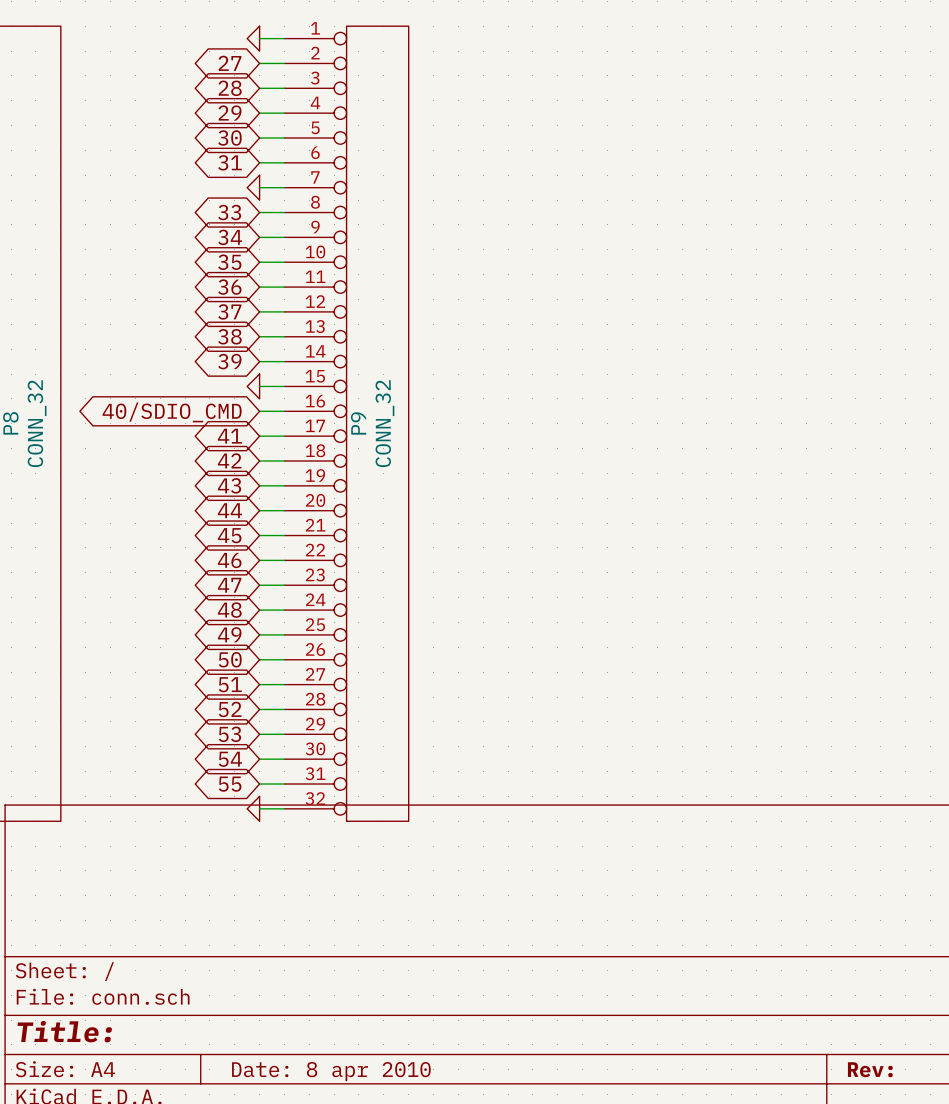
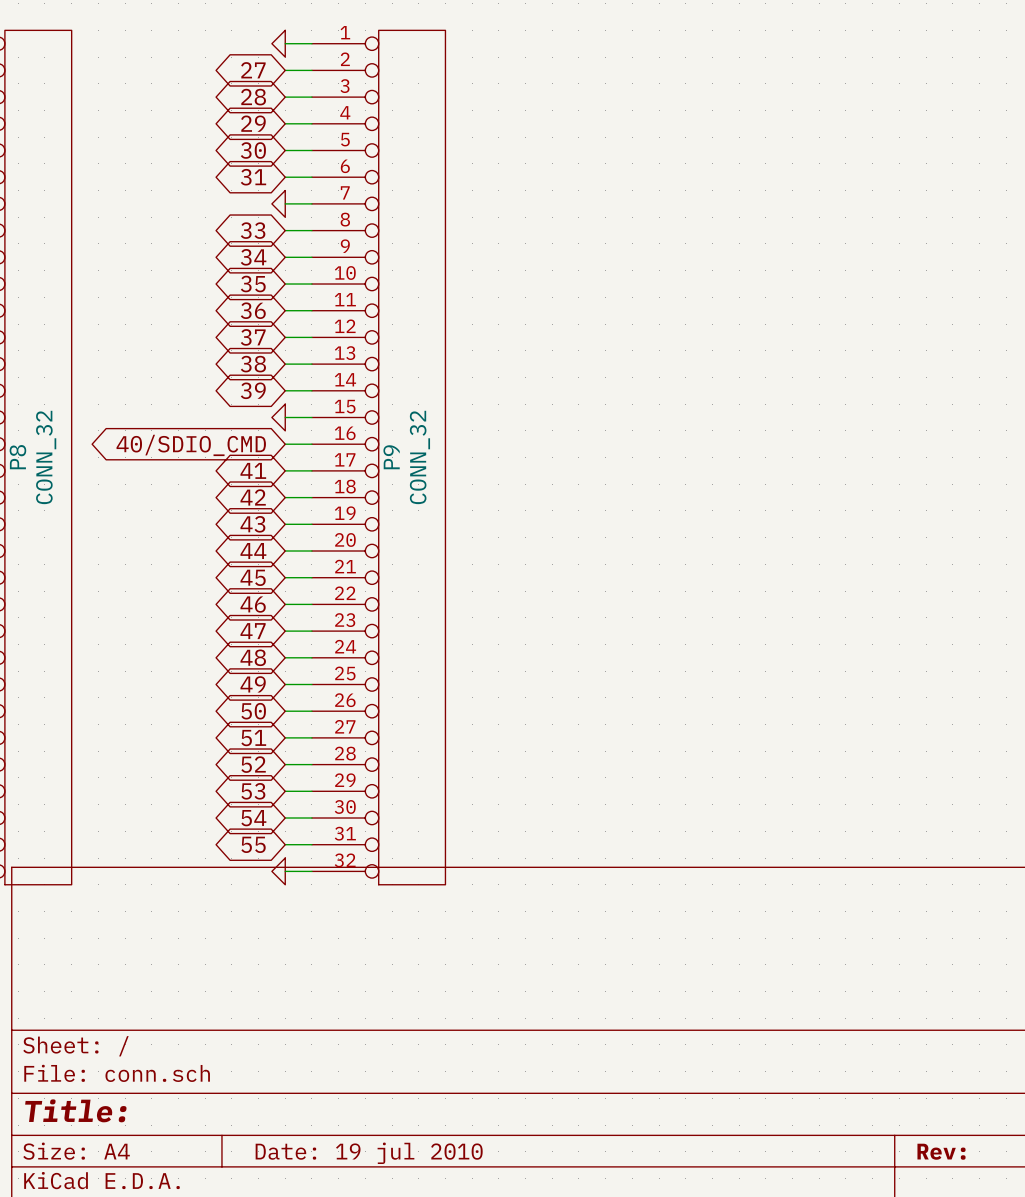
title block: Date: 8 apr 2010 (331, 1071) -> Date: 19 jul 2010 (369, 1153)

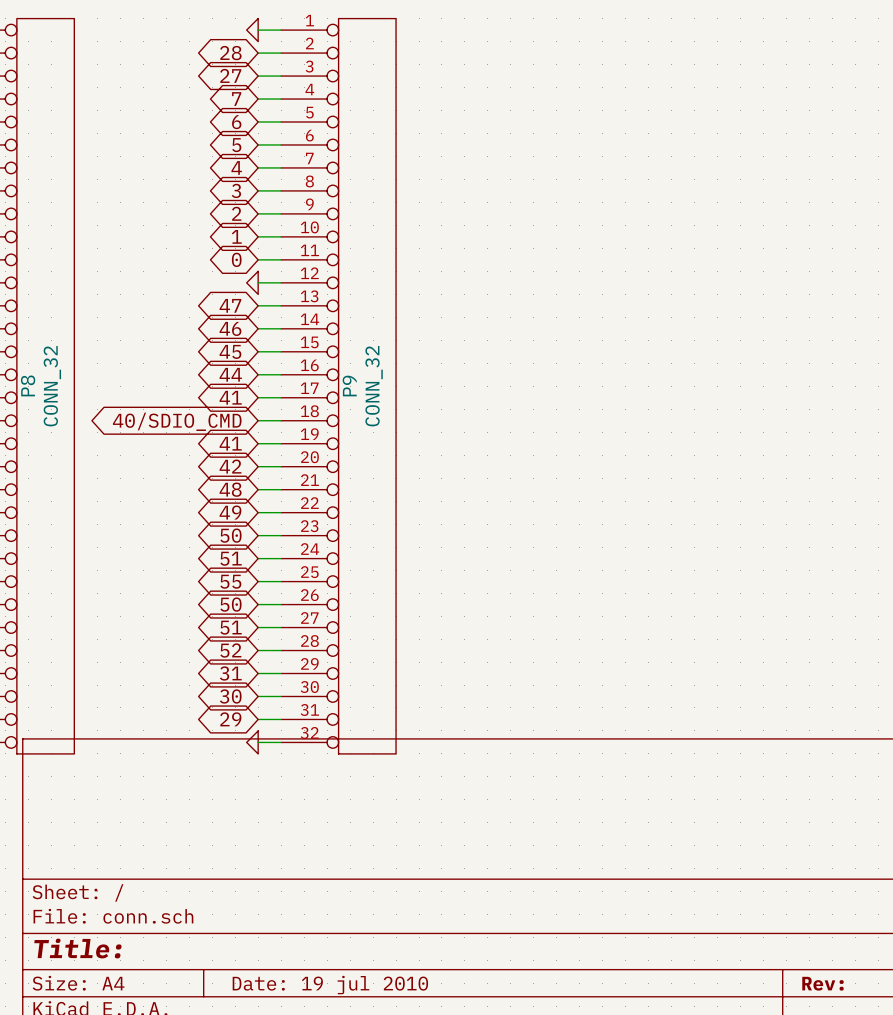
global label: 27 (253, 70) -> 28 (230, 53)
global label: 28 (253, 97) -> 27 (230, 75)
global label: 29 (253, 123) -> 7 (236, 99)
global label: 30 (253, 150) -> 6 (236, 122)
global label: 31 (253, 177) -> 5 (236, 145)
global label: none -> 4 (236, 167)
power symbol: (278, 203) -> none
global label: 33 (253, 230) -> 3 (236, 190)
global label: 34 (253, 257) -> 2 (236, 213)
global label: 35 (253, 284) -> 1 (236, 236)
global label: 36 (253, 310) -> 0 (236, 259)
global label: 37 (253, 337) -> none
power symbol: none -> (252, 282)
global label: 38 (253, 364) -> 47 (230, 305)
global label: 39 (253, 390) -> 46 (230, 328)
global label: none -> 45 (230, 351)
power symbol: (278, 417) -> none
global label: 40/SDIO_CMD (191, 445) -> 44 (230, 374)
global label: 42 (253, 497) -> 40/SDIO_CMD (177, 421)
global label: 43 (252, 524) -> 41 (230, 443)
global label: 44 (253, 551) -> 42 (230, 466)
global label: 45 (253, 577) -> 48 (230, 489)
global label: 46 (253, 604) -> 49 (230, 512)
global label: 47 (253, 631) -> 50 (230, 535)
global label: 48 (253, 657) -> 51 (231, 558)
global label: 49 (253, 684) -> 55 (230, 581)
global label: 53 (253, 791) -> 31 (230, 673)
global label: 54 (253, 818) -> 30 (230, 696)
global label: 55 (253, 844) -> 29 (230, 719)

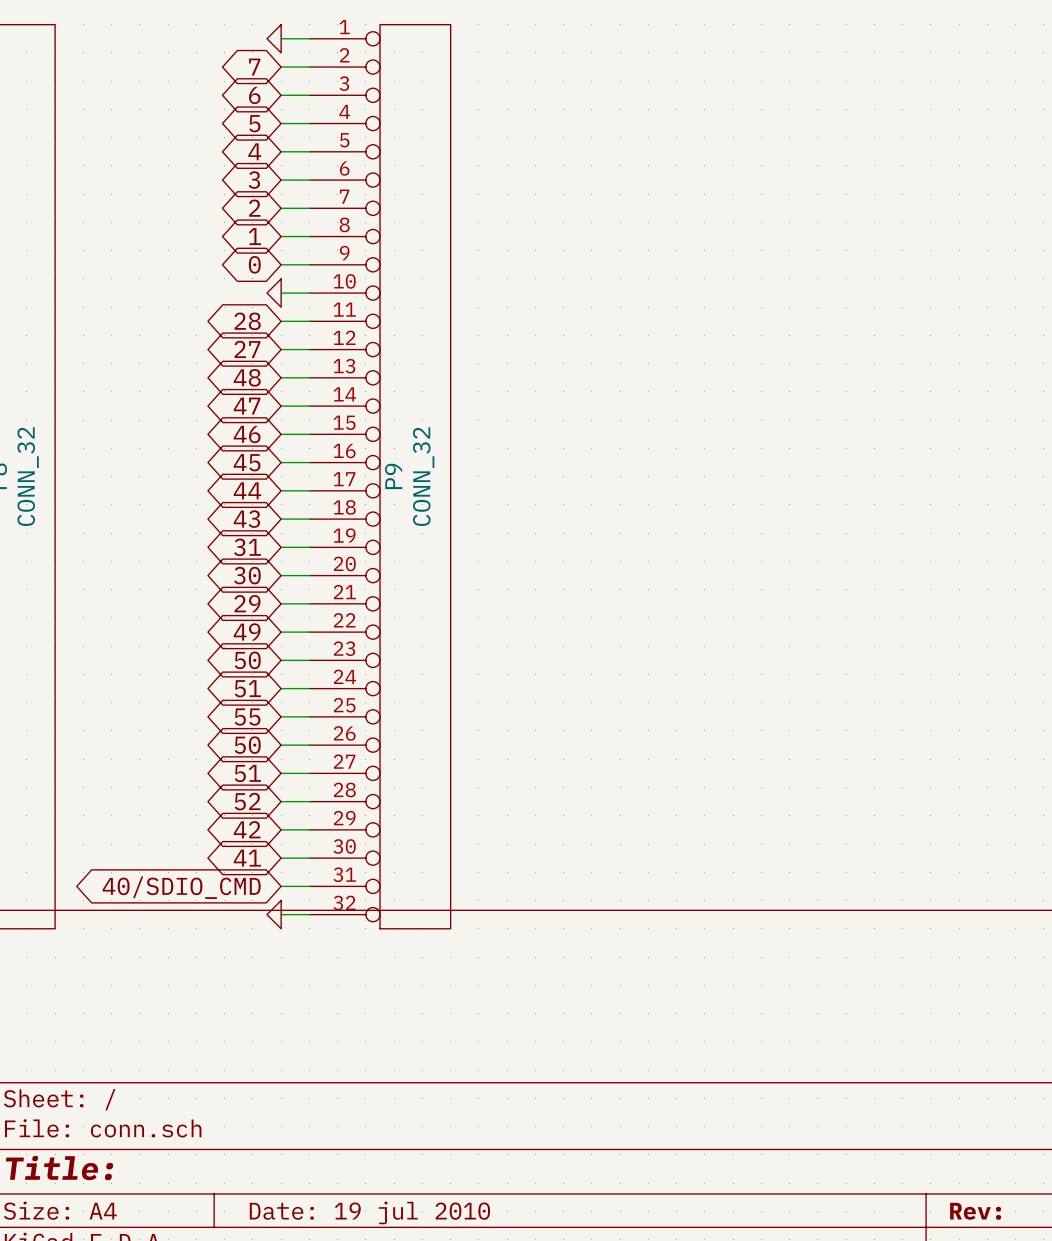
global label: 28 (230, 53) -> 7 (254, 67)
global label: 27 (230, 75) -> 6 (254, 95)
global label: 7 (236, 99) -> 5 (254, 123)
global label: 6 (236, 122) -> 4 (254, 151)
global label: 5 (236, 145) -> 3 (254, 180)
global label: 4 (236, 167) -> 2 (254, 208)
global label: 3 (236, 190) -> 1 (254, 236)
global label: 2 (236, 213) -> 0 (254, 264)
global label: 1 (236, 236) -> none
global label: 0 (236, 259) -> 28 (247, 321)
global label: none -> 27 (247, 349)
power symbol position: (252, 282) -> (274, 293)
global label: 47 (230, 305) -> 48 (247, 377)
global label: 46 (230, 328) -> 47 (247, 406)
global label: 45 (230, 351) -> 46 (247, 434)
global label: 44 (230, 374) -> 45 (247, 462)
global label: 41 (230, 397) -> 44 (247, 490)
global label: 40/SDIO_CMD (177, 421) -> 43 (246, 519)
global label: 41 (230, 443) -> 31 (247, 547)
global label: 42 (230, 466) -> 30 (247, 575)
global label: 48 (230, 489) -> 29 (247, 603)
global label: 31 (230, 673) -> 42 (247, 829)
global label: 30 (230, 696) -> 41 (247, 858)
global label: 29 (230, 719) -> 40/SDIO_CMD (181, 887)

